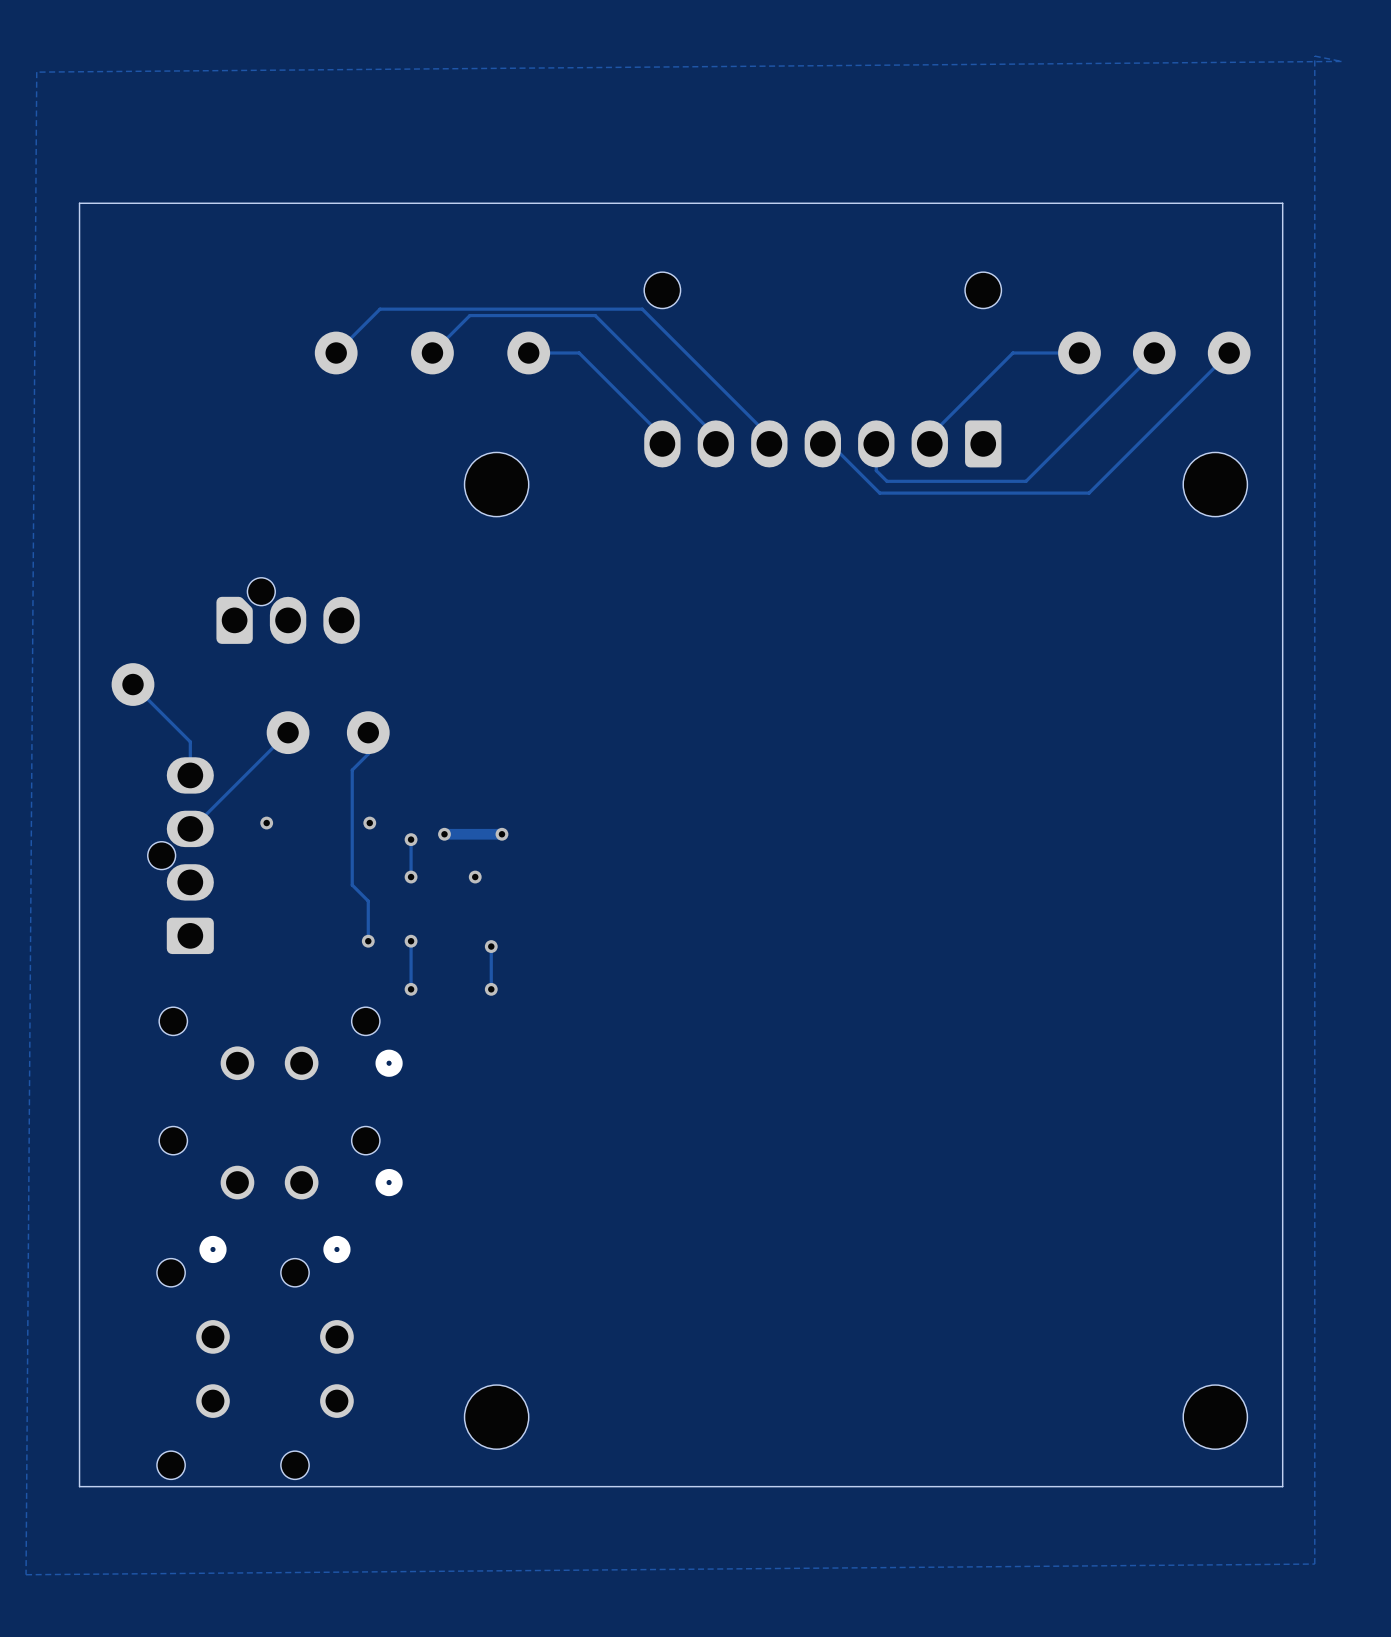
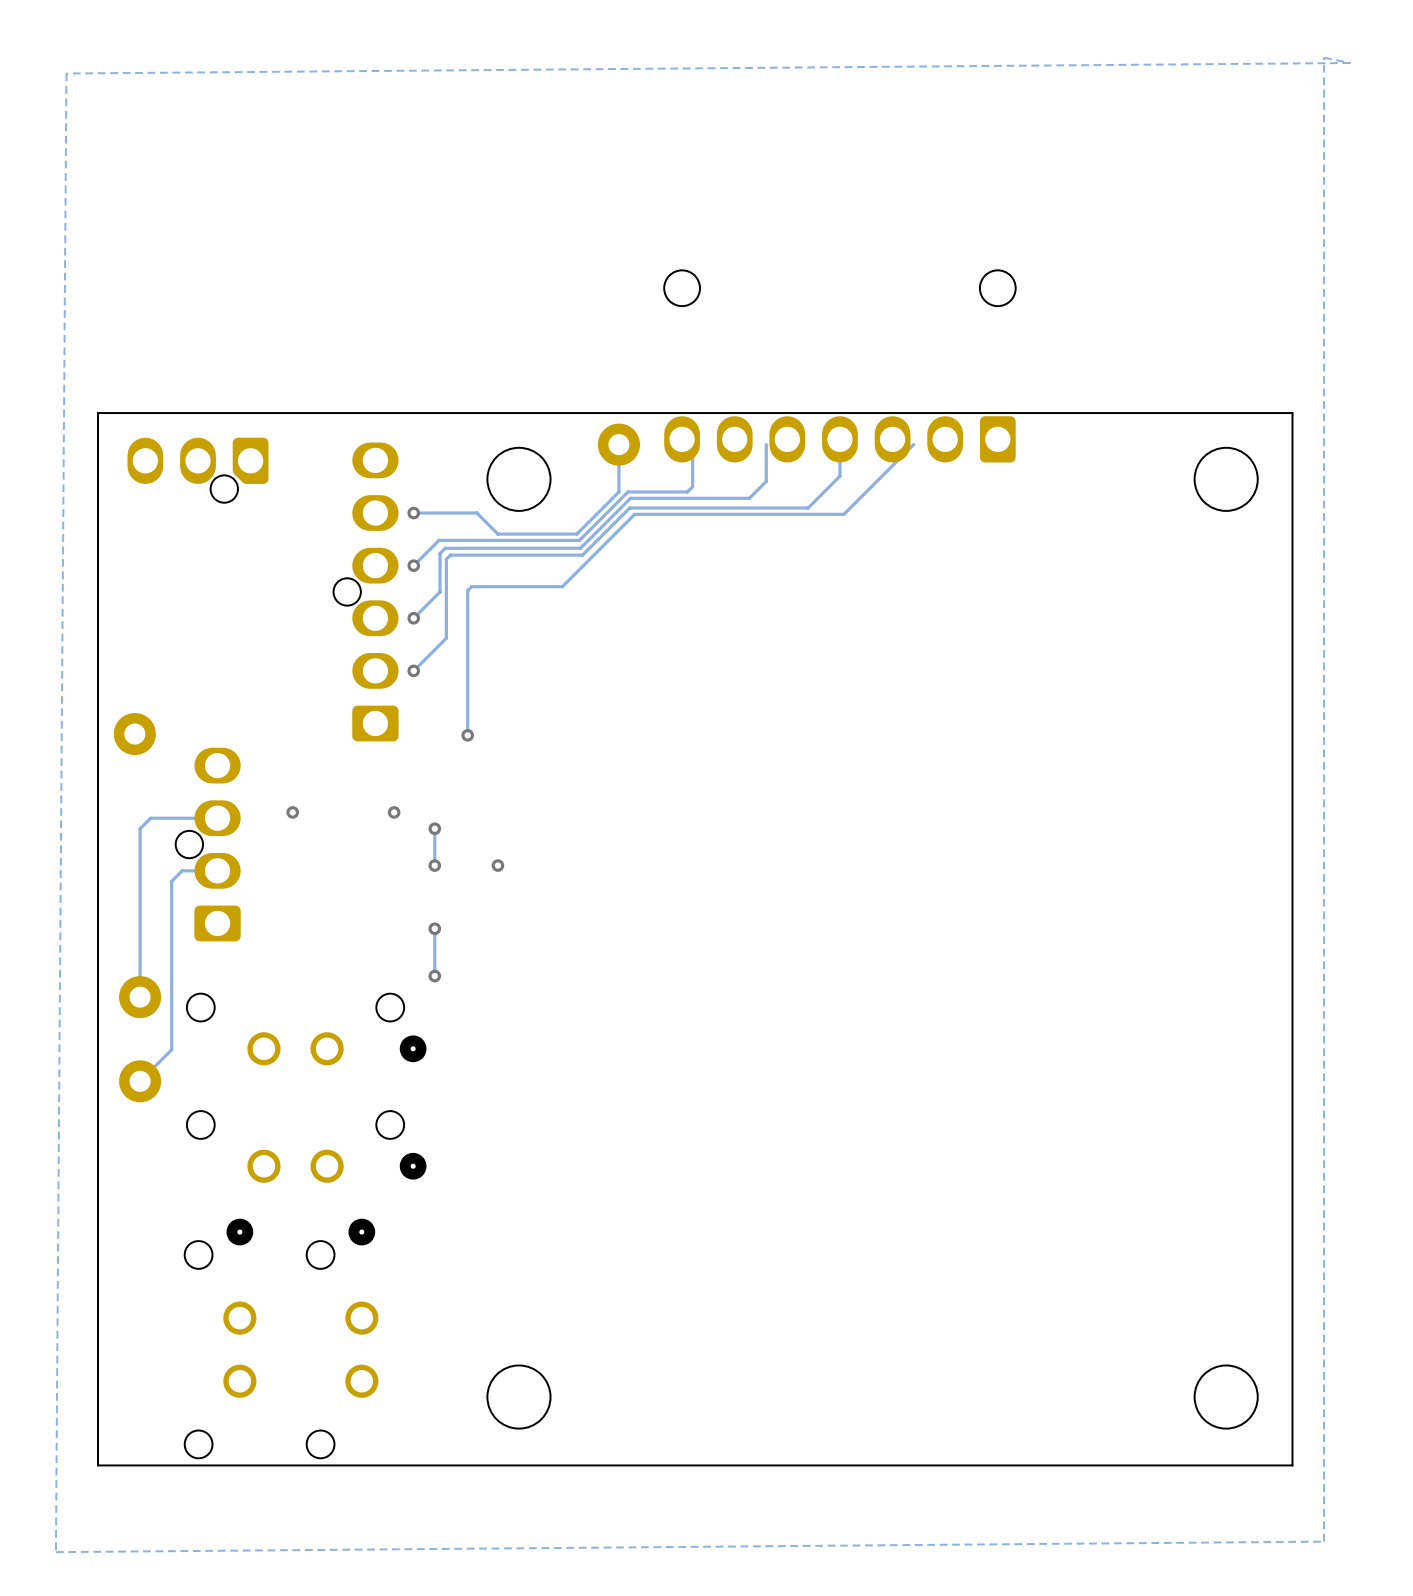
track: (336, 353) (380, 309) (642, 309) (769, 436) -> none
part: (336, 353) -> none
track: (432, 353) (469, 315) (595, 315) (715, 436) -> none
part: (432, 353) -> none
track: (528, 353) (579, 353) (662, 436) -> none
part: (528, 353) -> none
track: (1079, 353) (1012, 353) (929, 436) -> none
part: (1079, 353) -> none
track: (1154, 353) (1026, 481) (886, 481) (876, 470) (876, 443) -> none
part: (1154, 353) -> none
track: (1229, 353) (1089, 493) (879, 493) (822, 436) -> none
part: (1229, 353) -> none
board edge: (1282, 417) (1282, 203) (79, 203) (79, 1486) -> (1292, 413) (98, 413) (98, 1465) (108, 1465)
track: none -> (618, 444) (618, 491) (576, 534) (497, 534) (476, 513) (413, 513)
part: none -> (618, 444)
track: none -> (692, 444) (692, 486) (687, 491) (627, 491) (579, 540) (438, 540) (413, 565)
track: none -> (766, 444) (766, 481) (749, 498) (630, 498) (580, 548) (445, 548) (440, 553) (440, 591) (413, 618)
track: none -> (839, 444) (839, 476) (808, 508) (629, 508) (582, 555) (450, 555) (446, 559) (446, 638) (413, 670)
track: none -> (913, 444) (843, 514) (634, 514) (562, 586) (471, 586) (467, 590) (467, 735)
via: none -> (413, 513)
via: none -> (413, 565)
part: none -> (366, 591)
part rotation: 0° (288, 610) -> 180° (197, 470)
part position: (288, 610) -> (197, 470)
via: none -> (413, 618)
via: none -> (413, 670)
track: (133, 684) (190, 741) (190, 775) -> none
part position: (133, 684) -> (134, 734)
track: (288, 732) (190, 828) -> (140, 997) (140, 828) (150, 818) (217, 818)
part: (288, 732) -> none
track: (368, 732) (368, 754) (352, 770) (352, 885) (368, 901) (368, 941) -> none
part: (368, 732) -> none
via: none -> (467, 735)
via: (444, 834) -> none
track: (501, 834) (444, 834) -> none
via: (501, 834) -> none
track: none -> (217, 870) (182, 870) (171, 881) (171, 1049) (140, 1081)
via: (368, 941) -> none
track: (491, 946) (491, 989) -> none
via: (491, 946) -> none
via: (491, 989) -> none
part: none -> (140, 997)
part: none -> (140, 1081)

